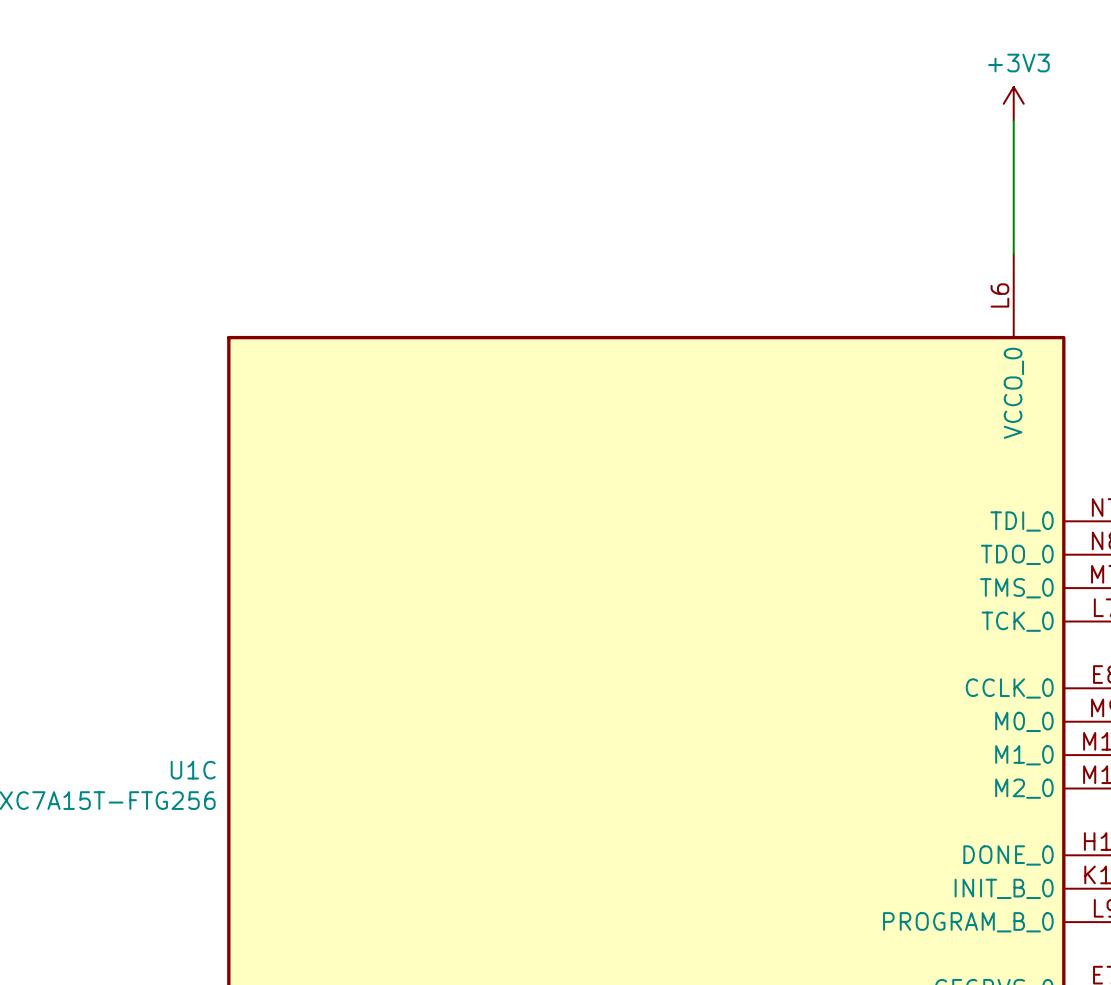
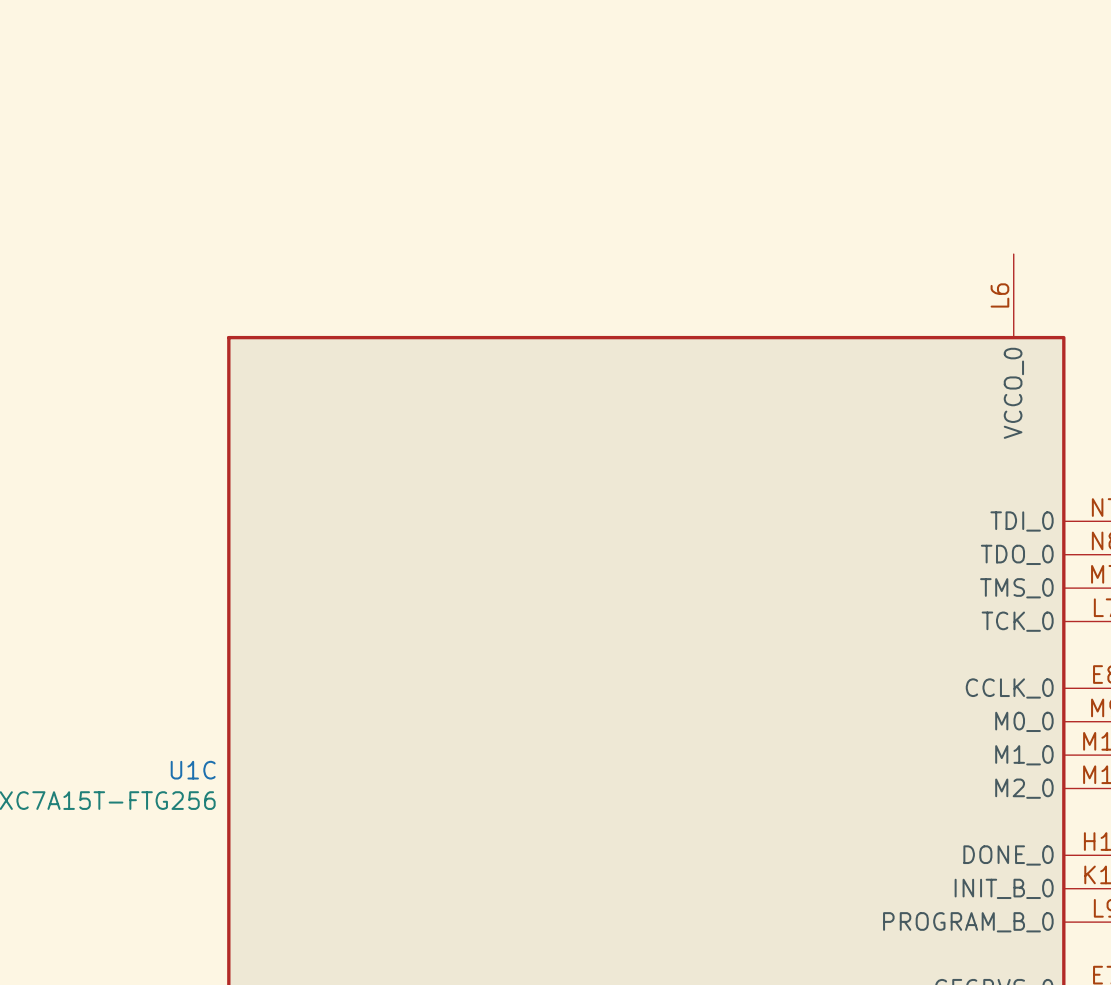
power symbol: +3V3 (1013, 103) -> none
wire: (1013, 120) (1013, 254) -> none

